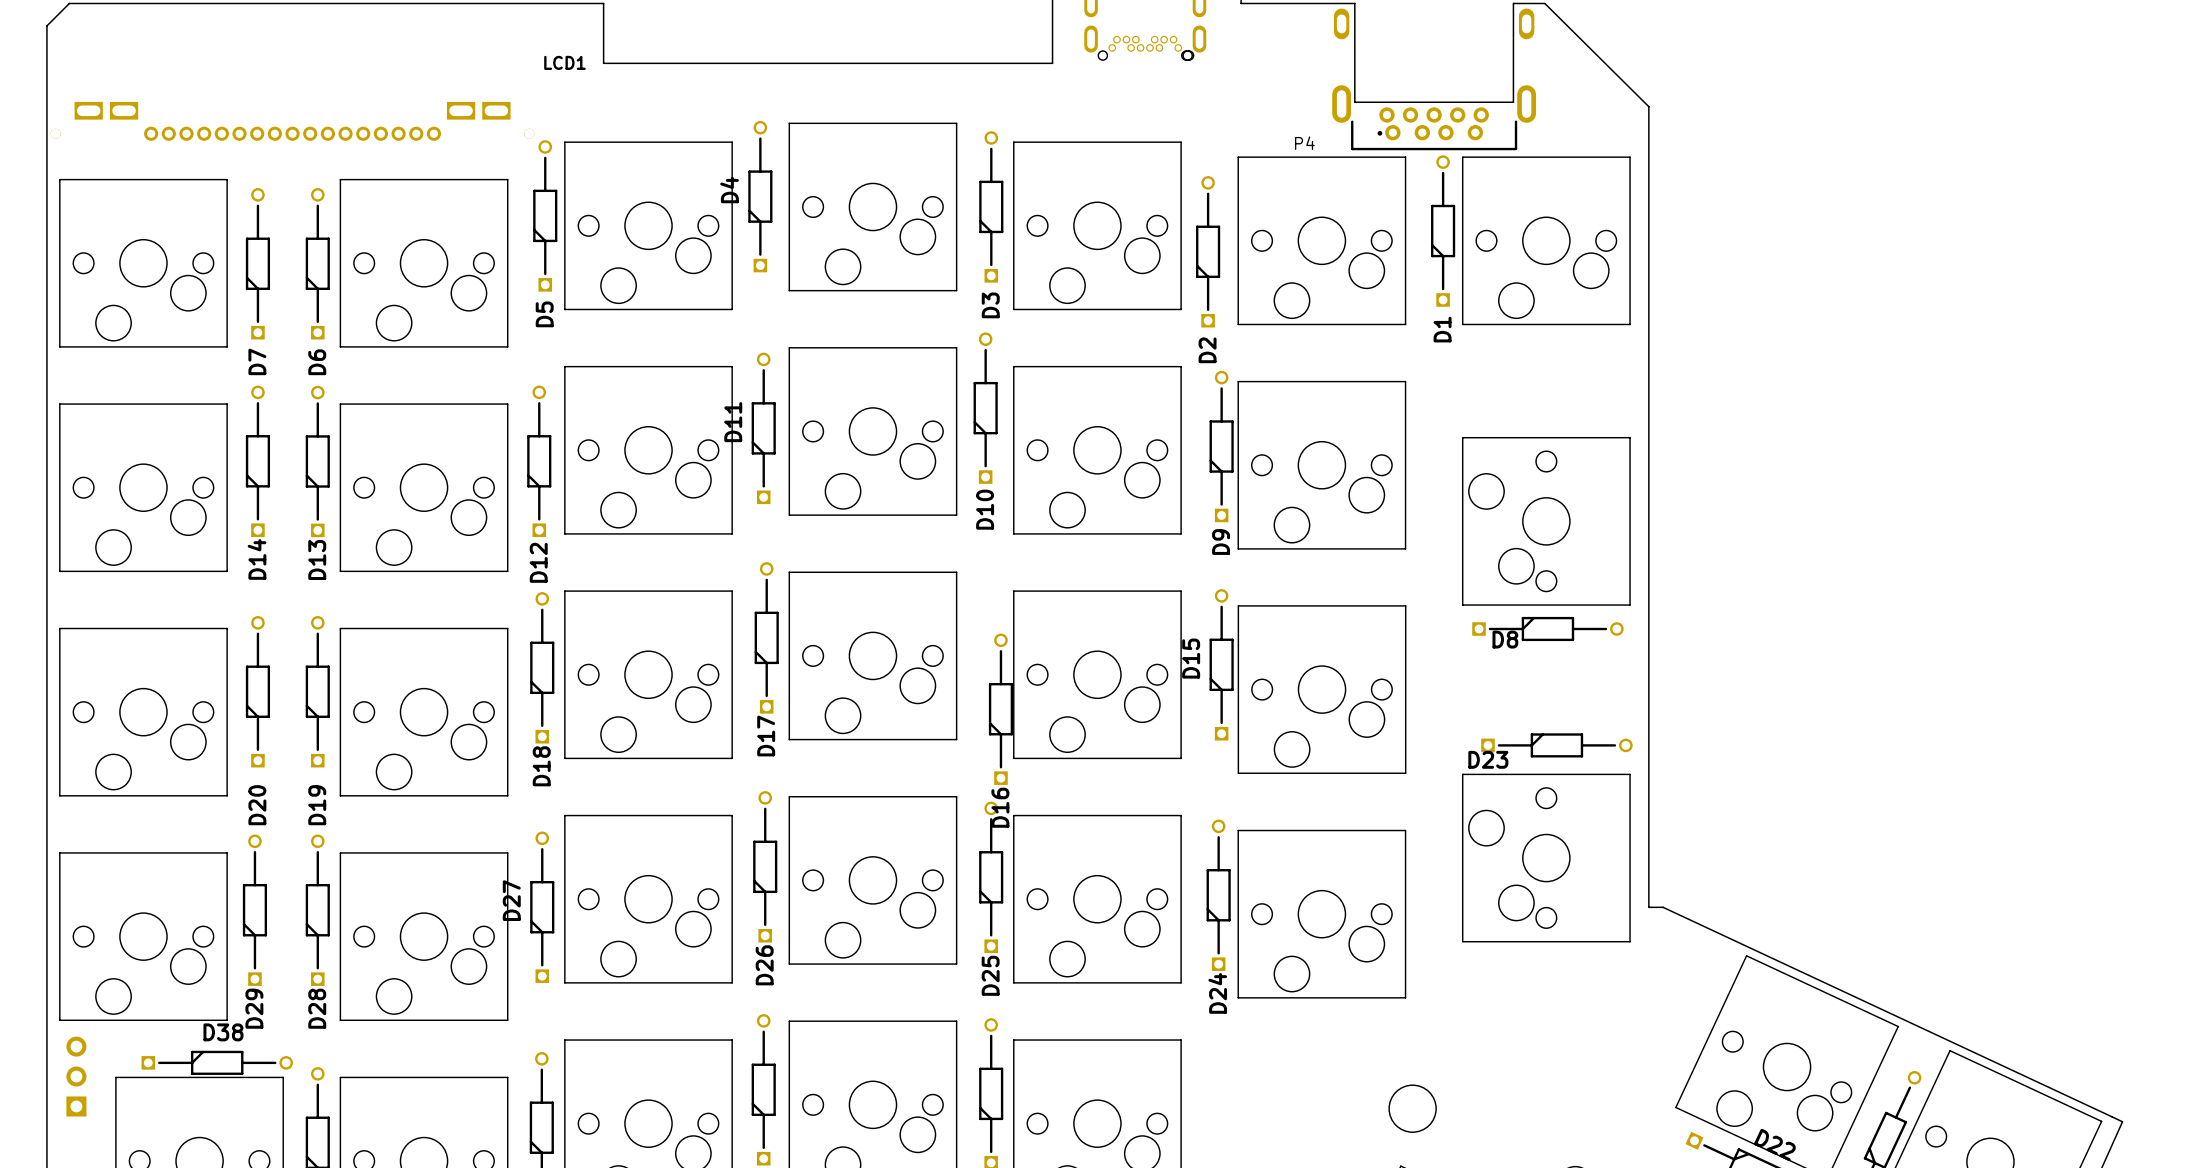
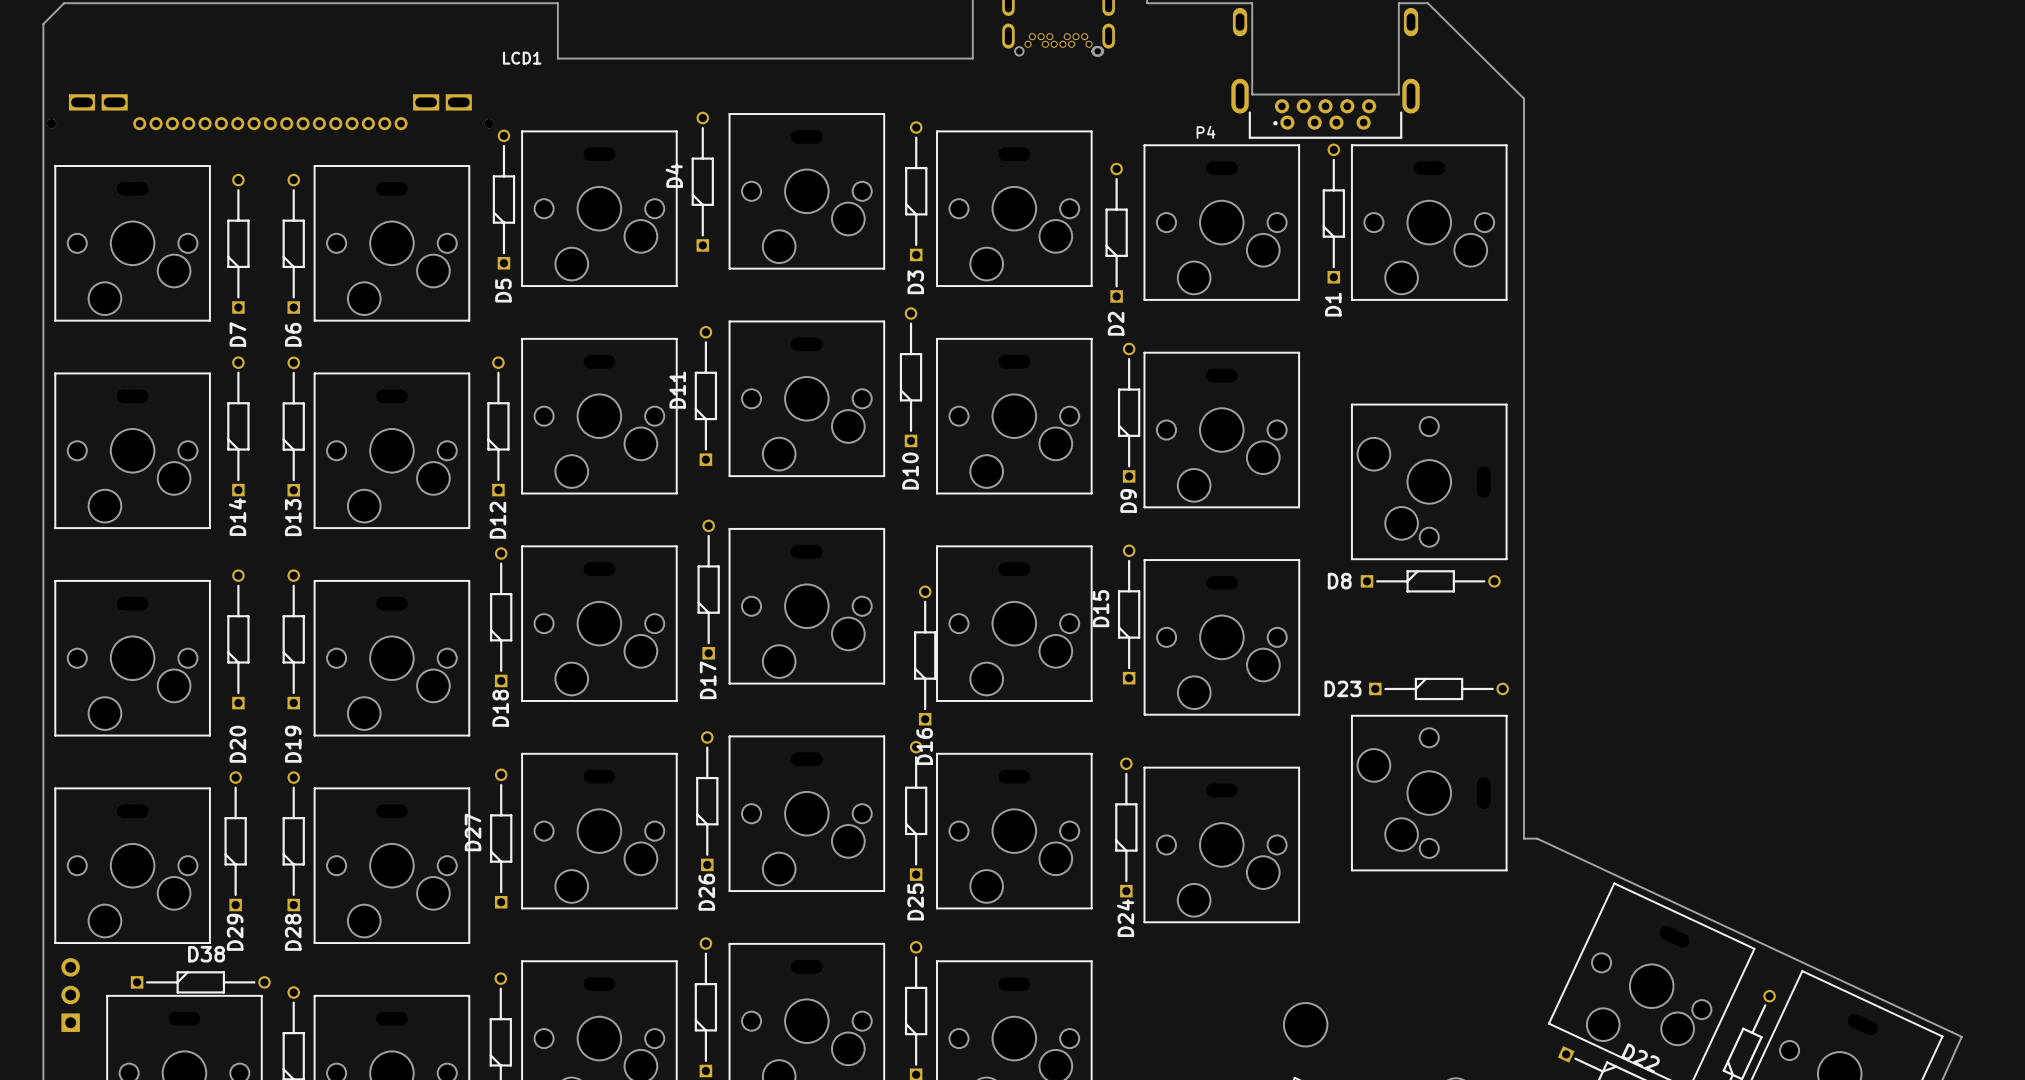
D8 name position: D8 (1505, 639) -> D8 (1339, 581)
D23 name position: D23 (1488, 759) -> D23 (1342, 688)

